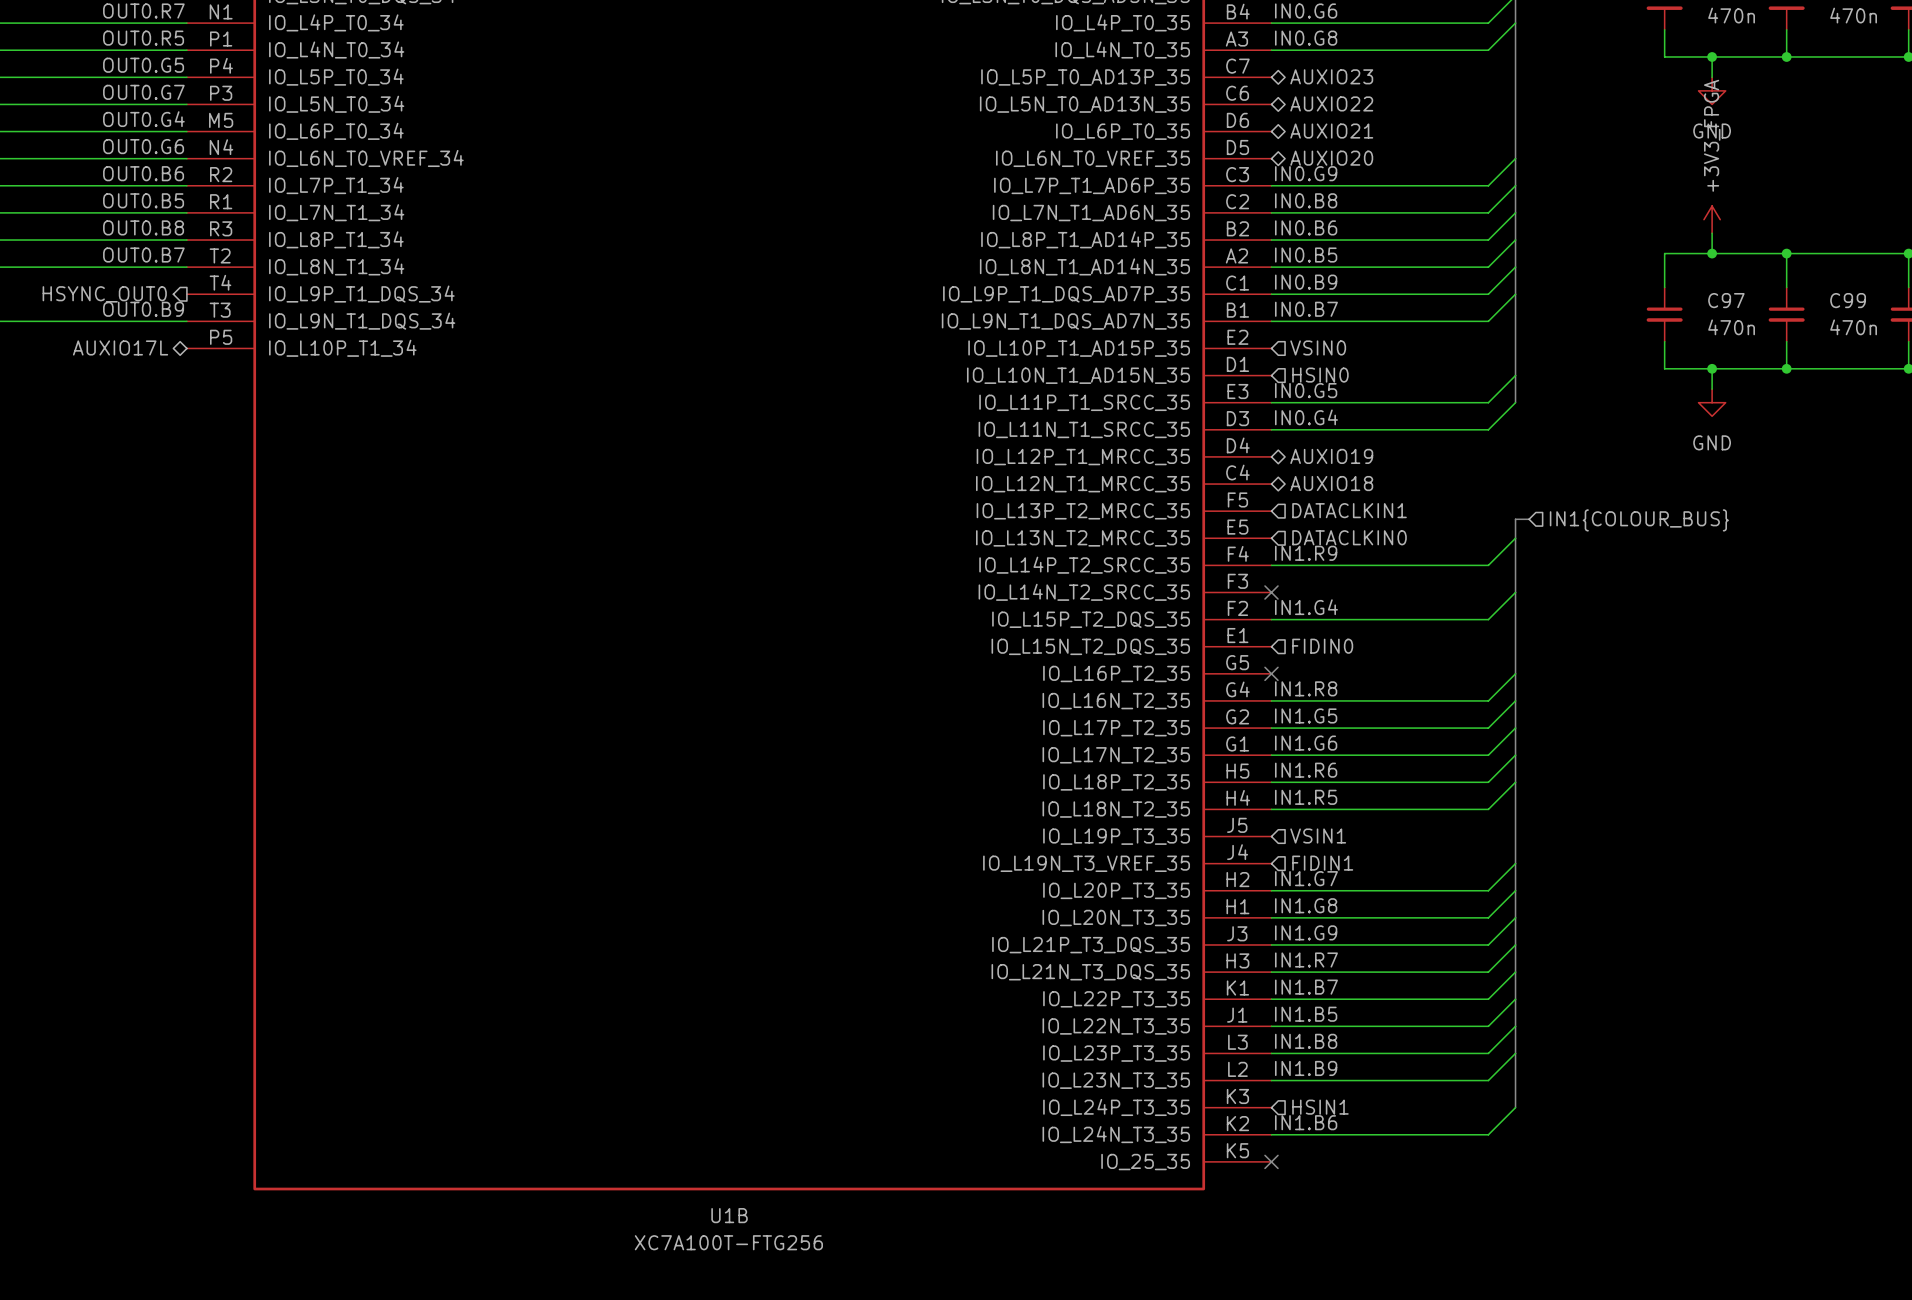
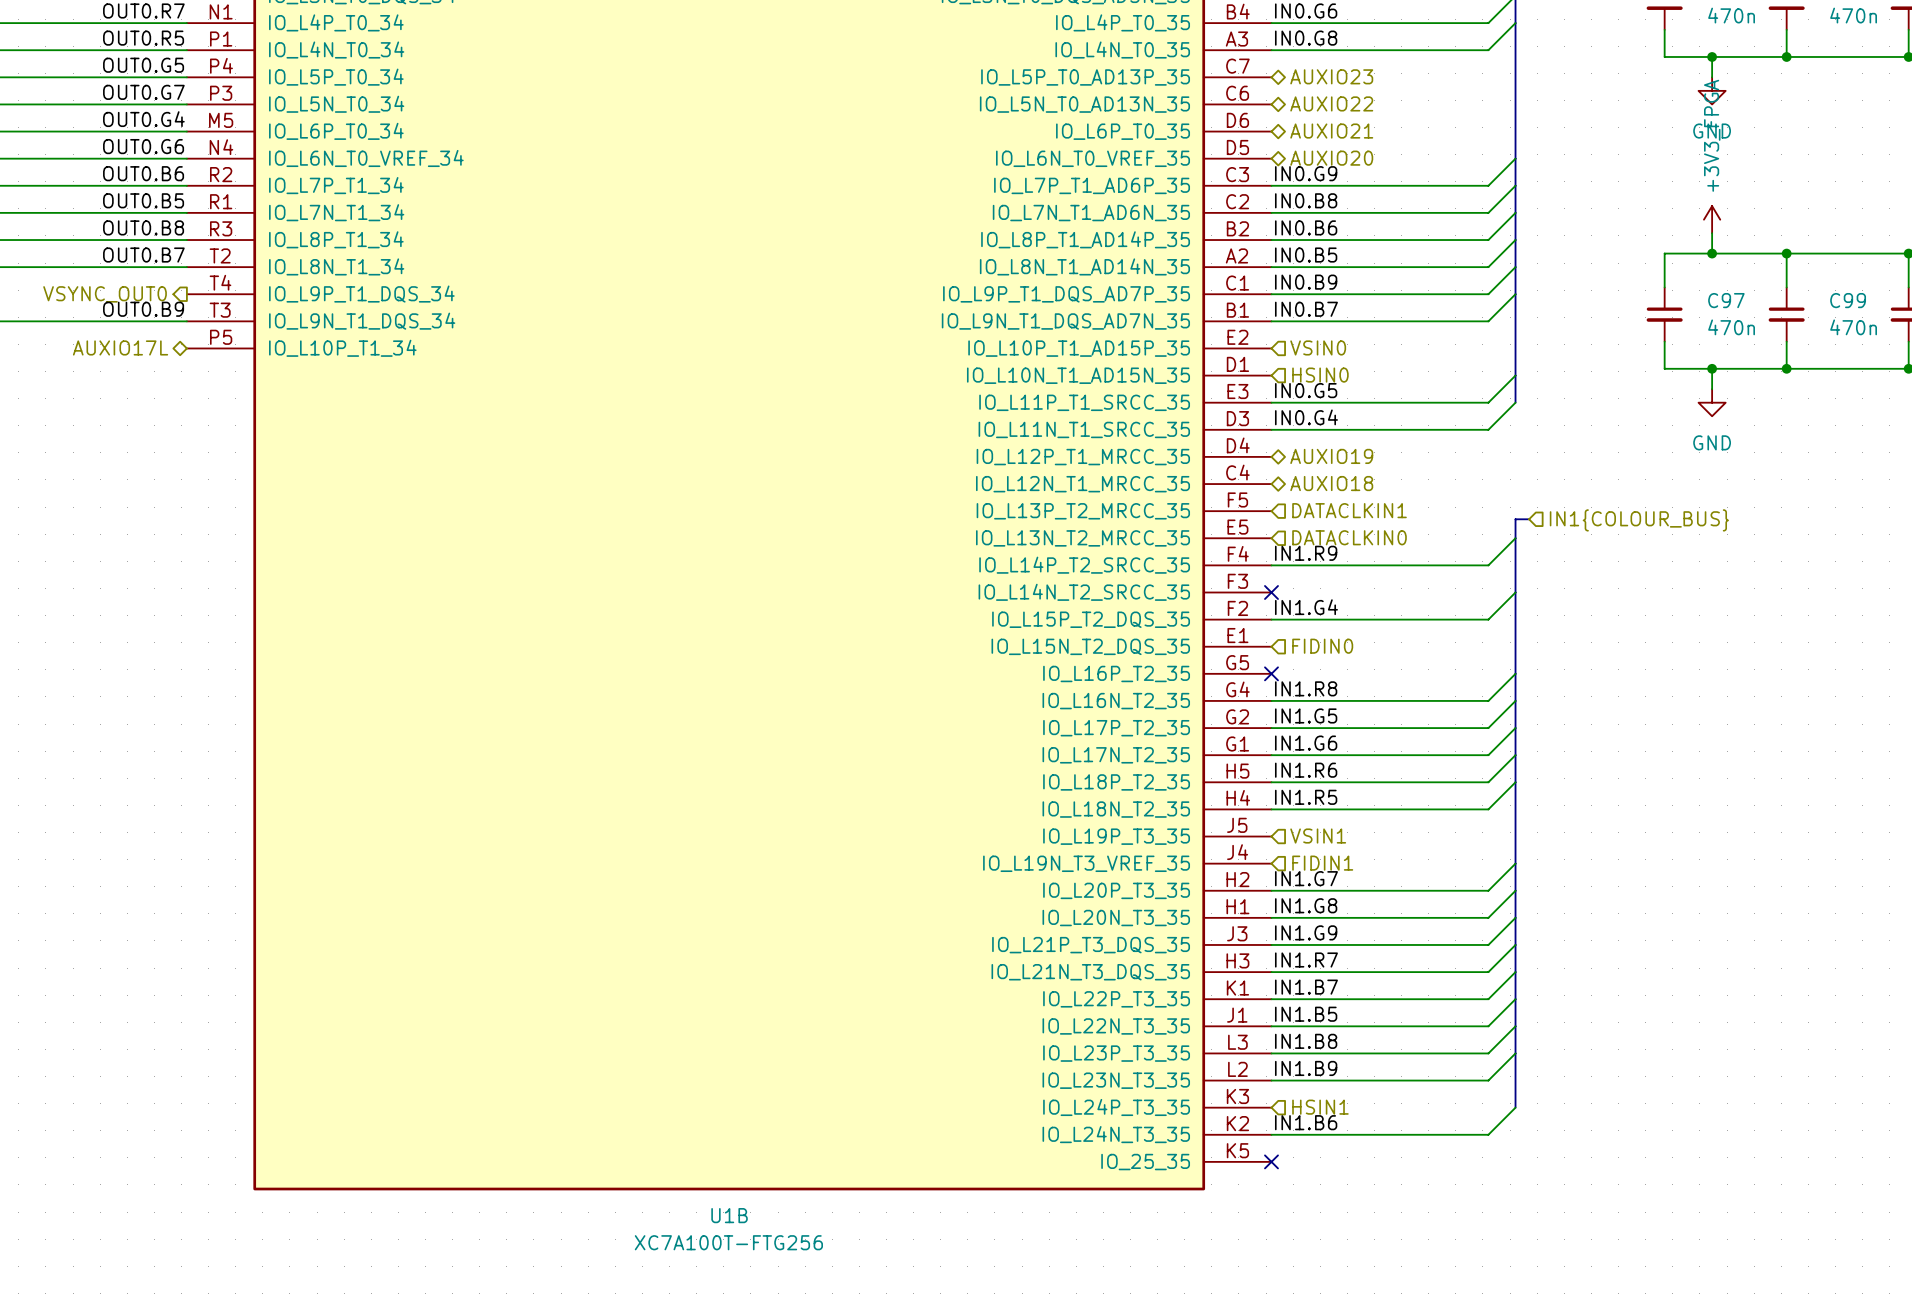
hierarchical label: HSYNC_OUT0 (104, 294) -> VSYNC_OUT0 (105, 294)

